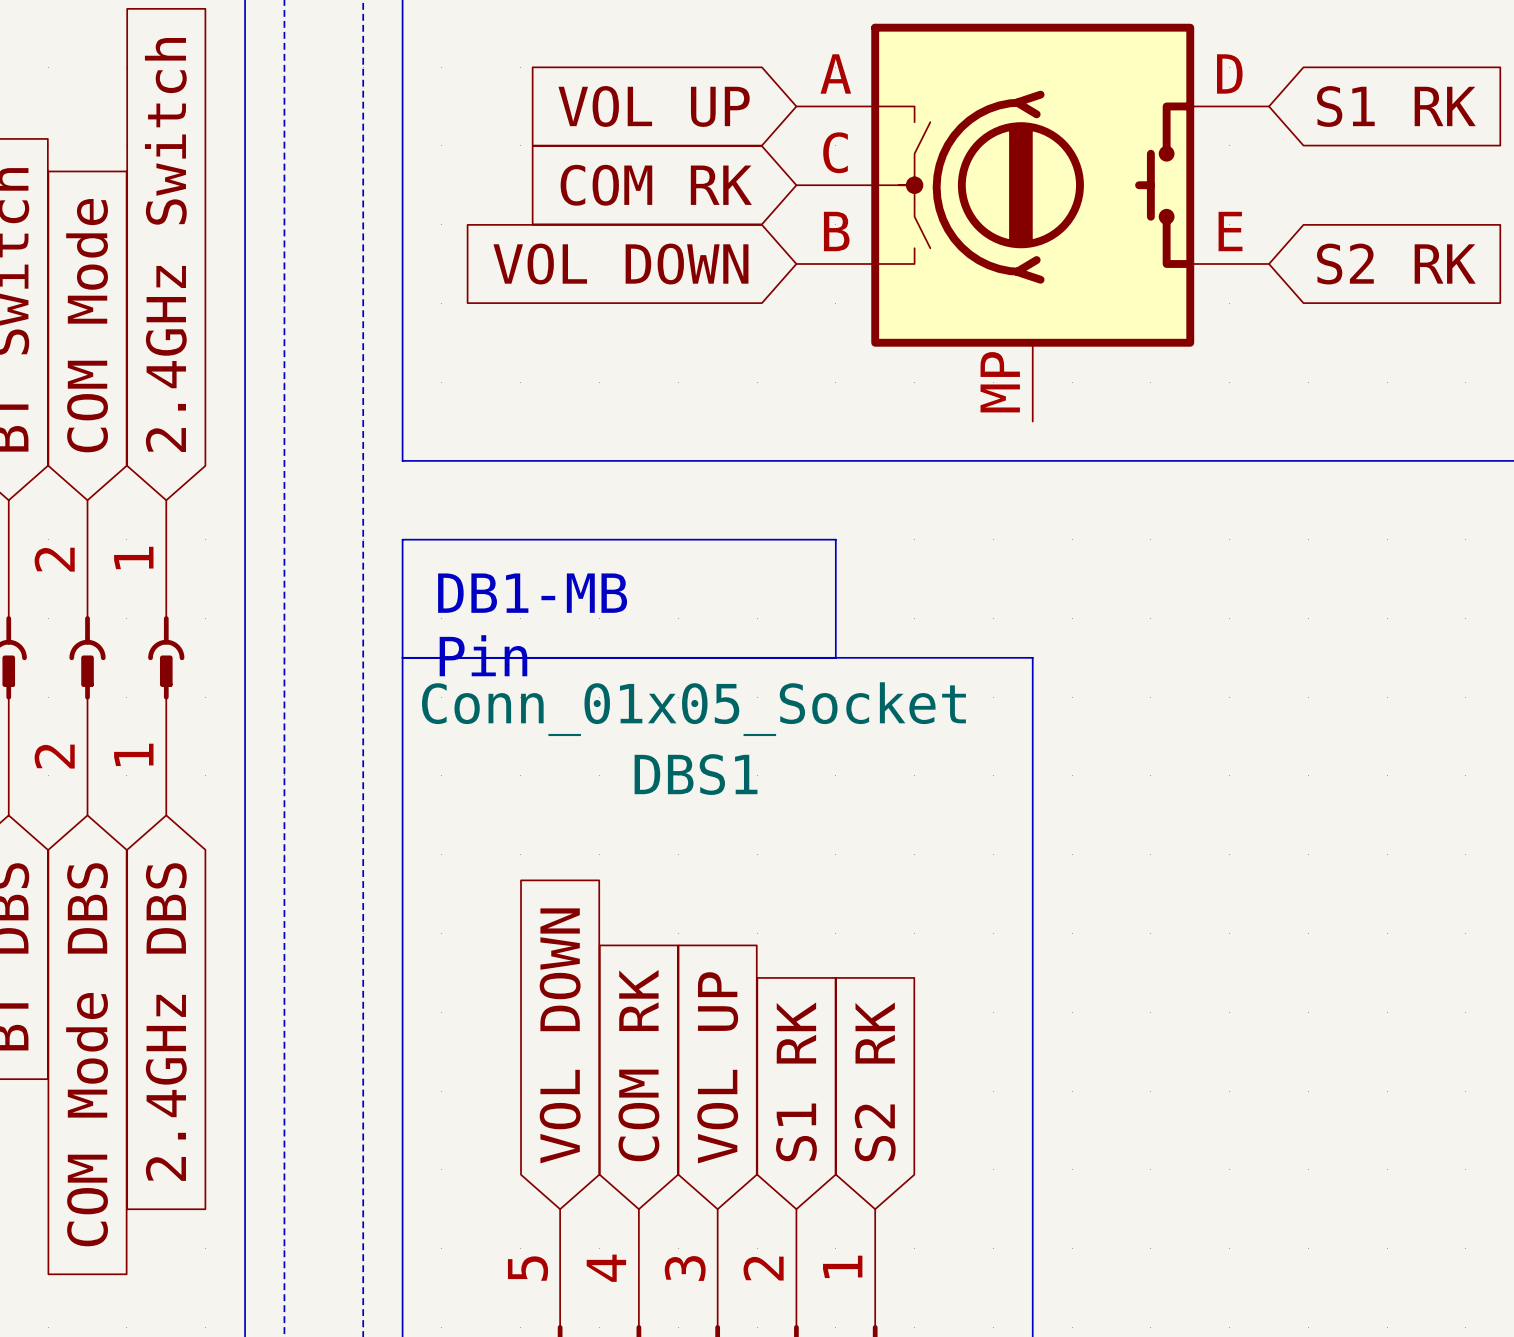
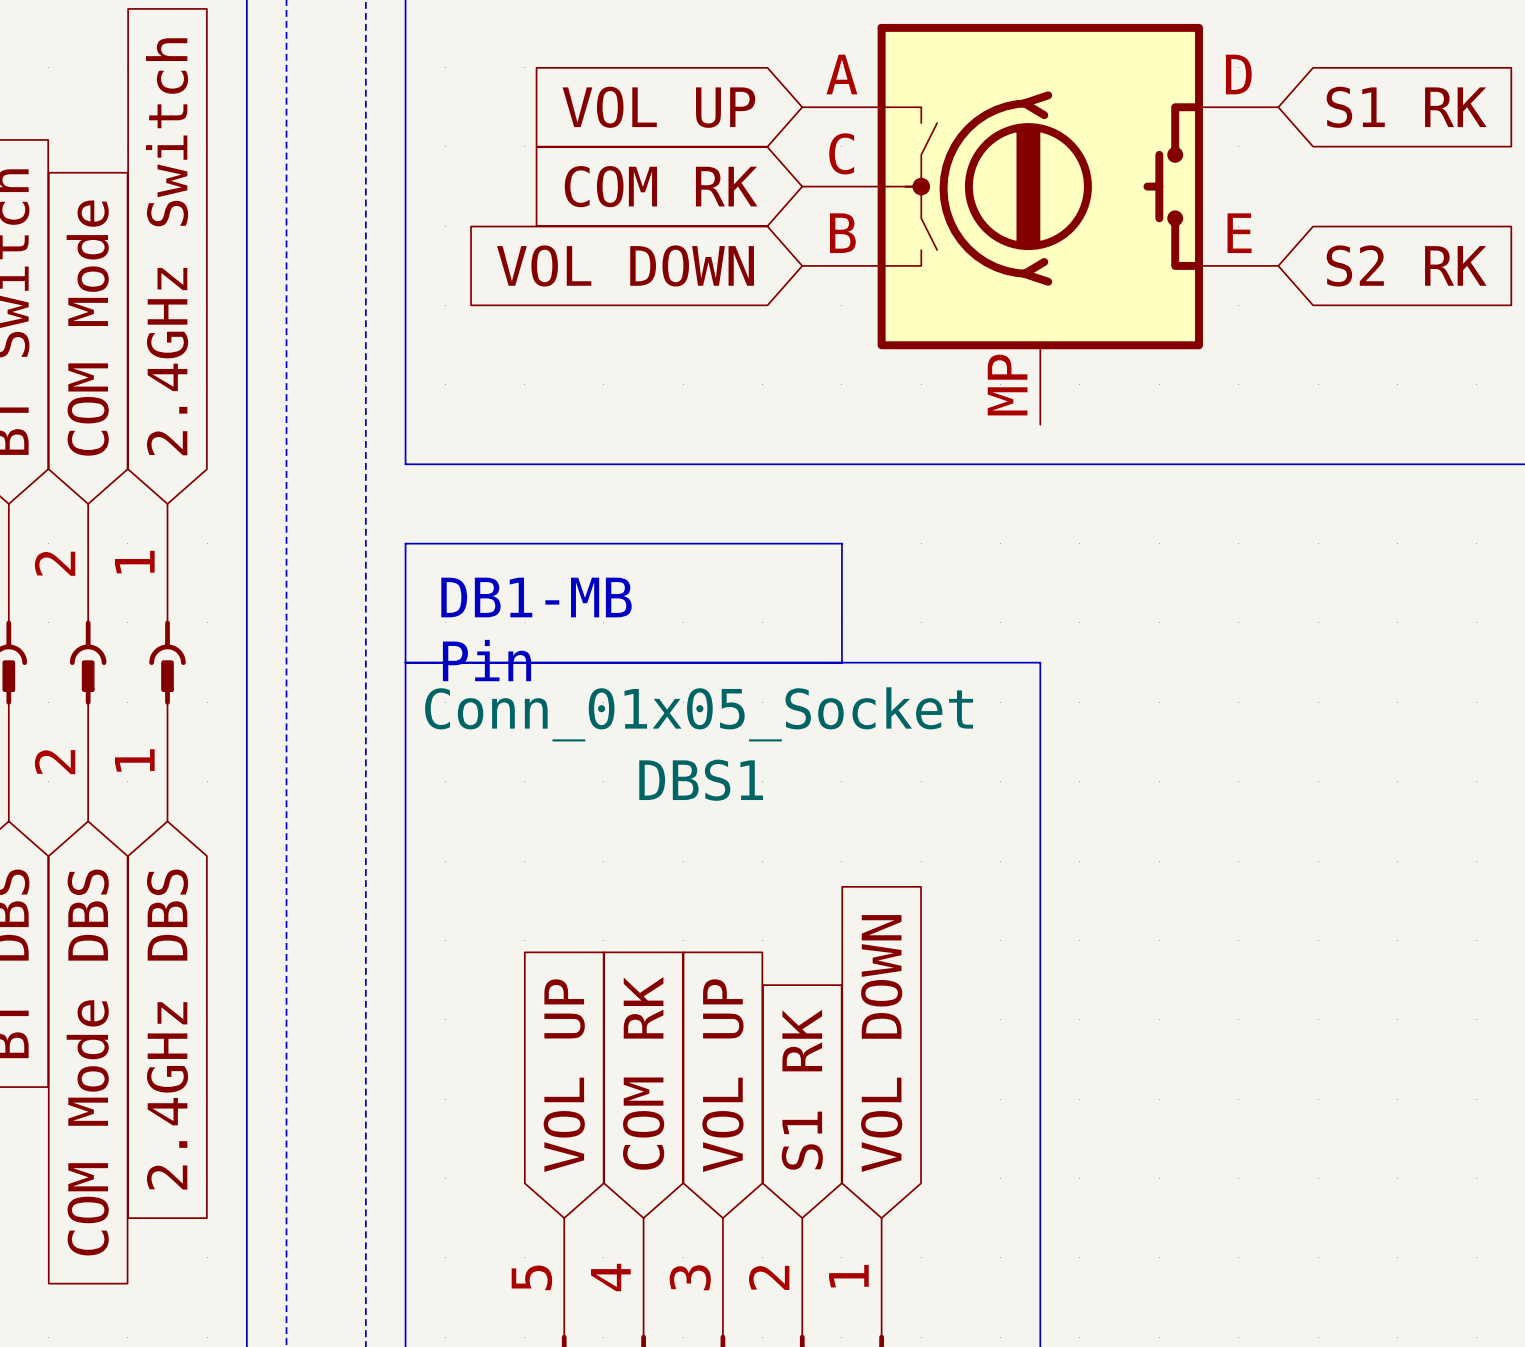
global label: VOL DOWN (560, 1035) -> VOL UP (564, 1075)
global label: S2 RK (875, 1081) -> VOL DOWN (881, 1043)

